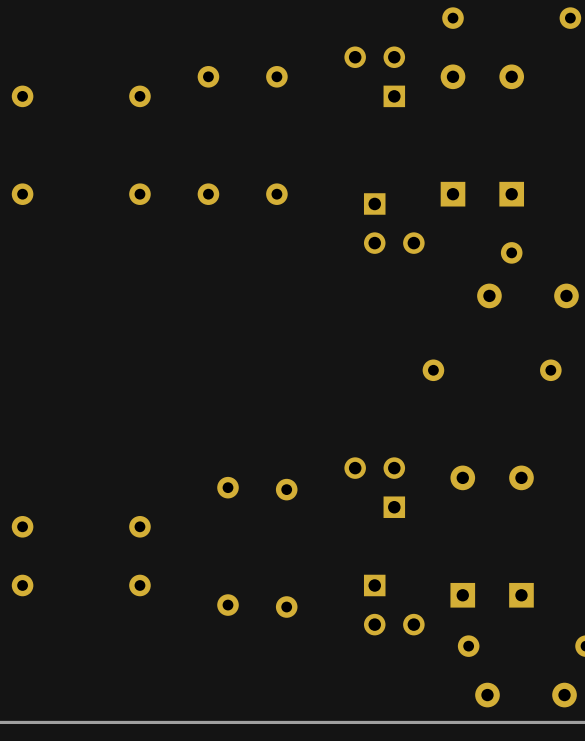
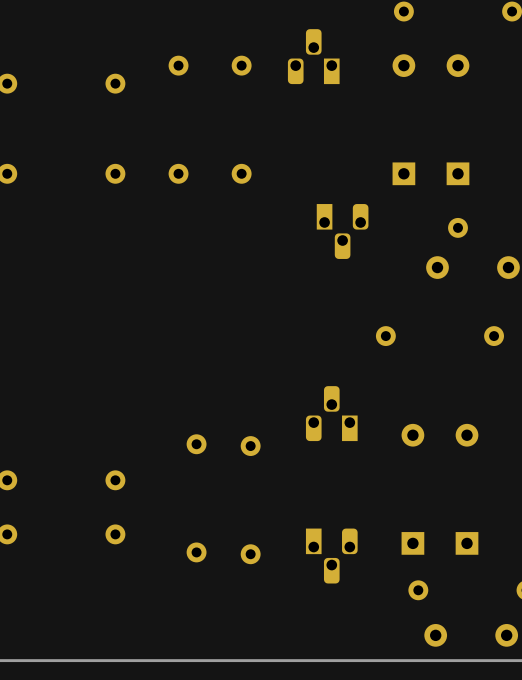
part: none -> (313, 56)
part: (374, 76) -> none
part: (394, 223) -> none
part: none -> (342, 231)
part: none -> (331, 413)
part: (374, 487) -> none
part: (394, 605) -> none
part: none -> (331, 556)

